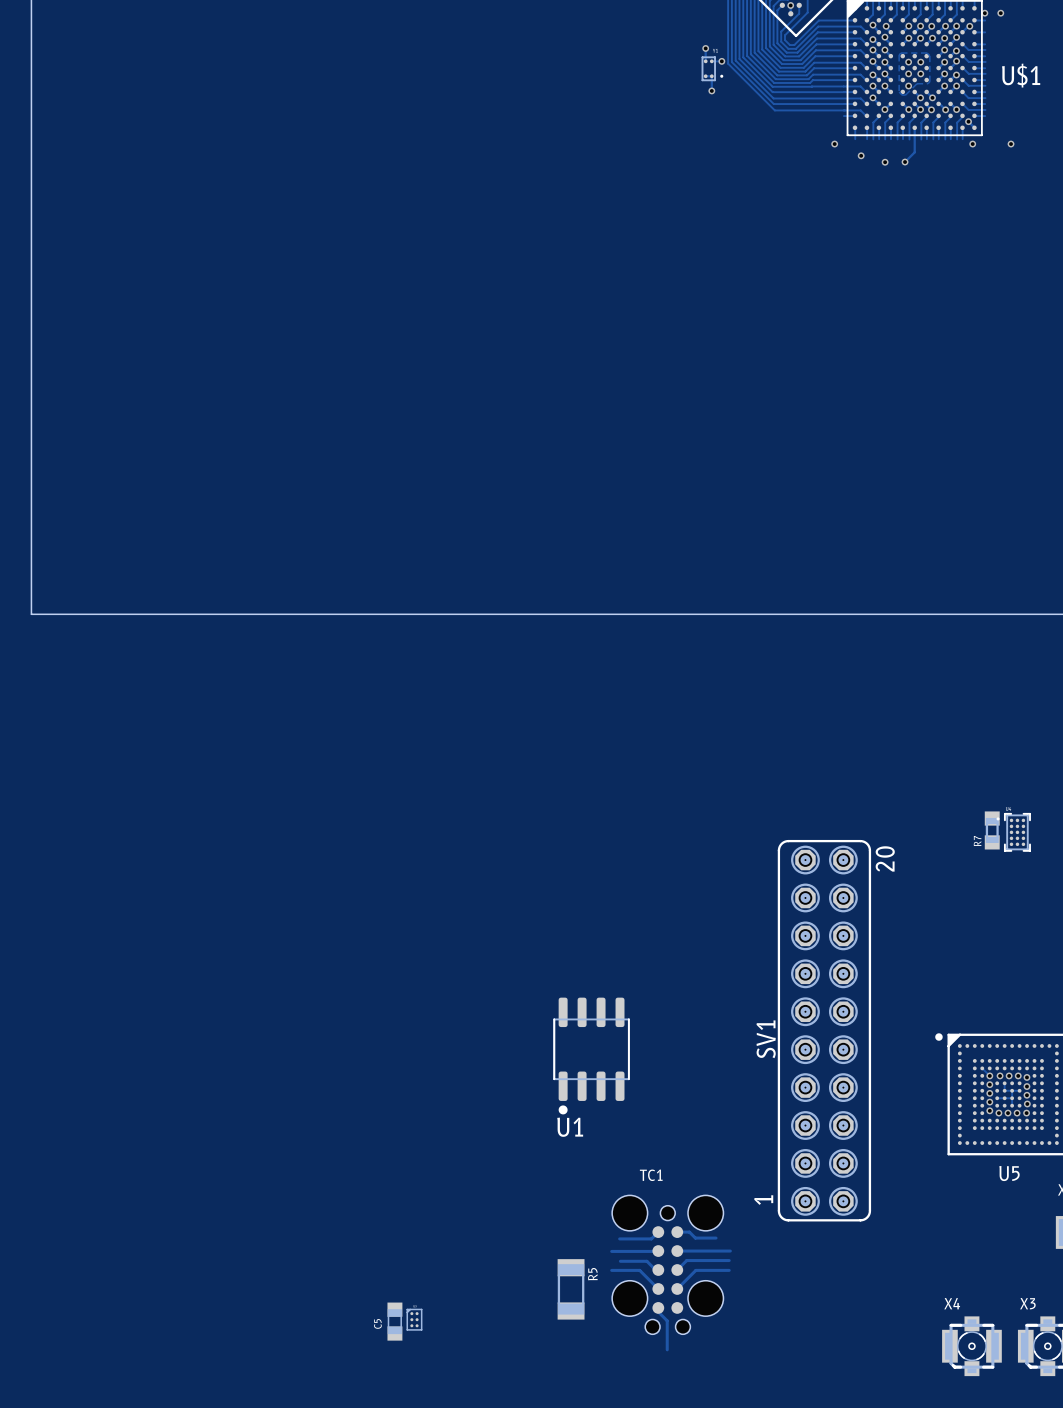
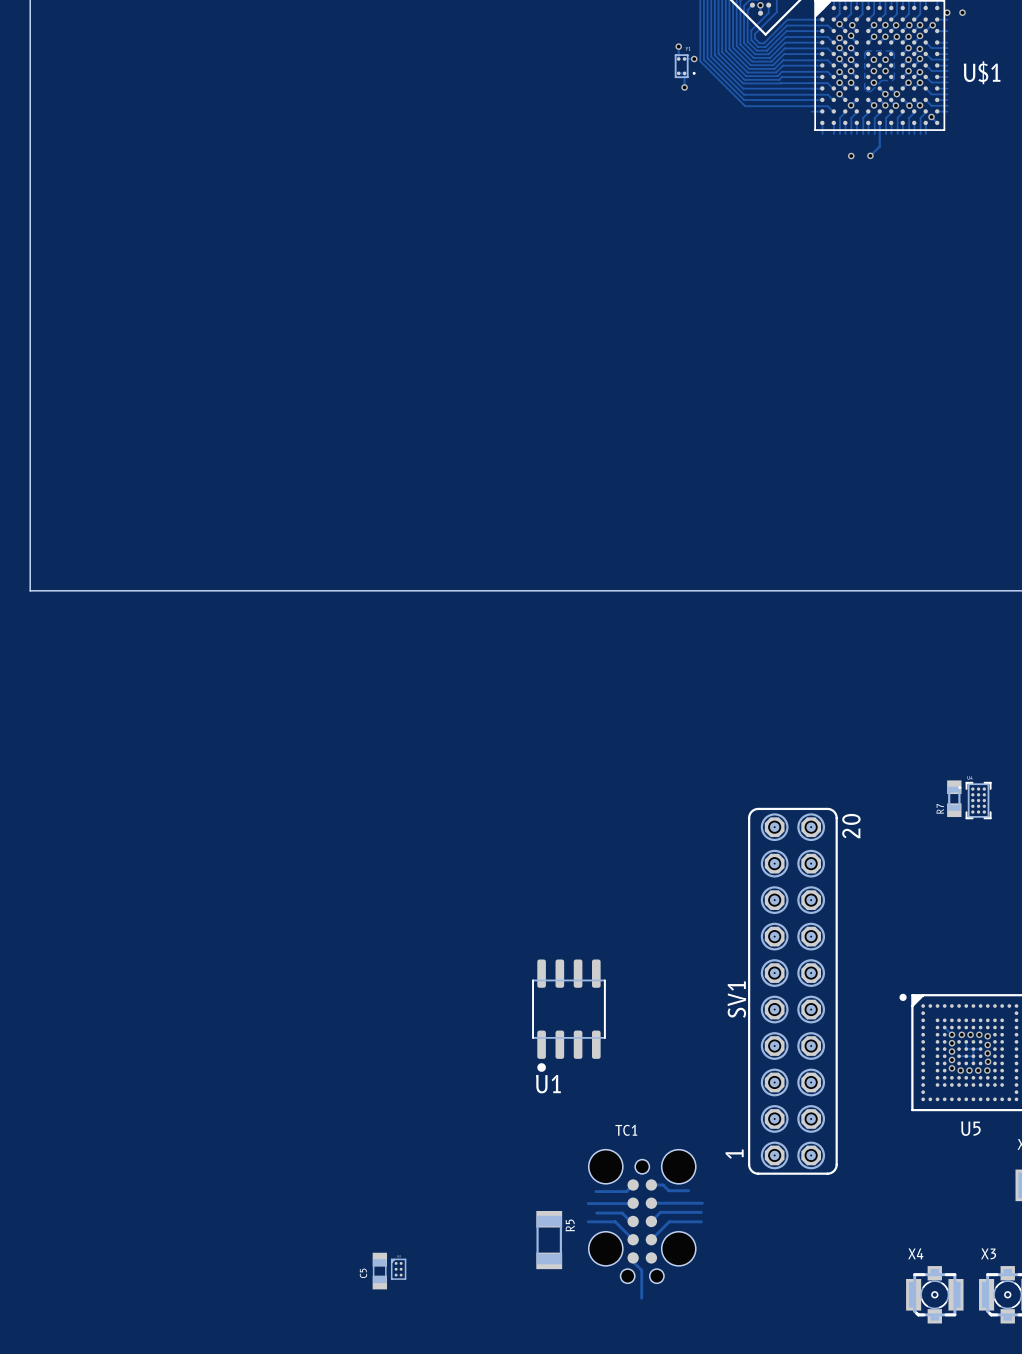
via: (834, 144) -> none
via: (972, 144) -> none
via: (1011, 144) -> none
via: (861, 155) -> none

